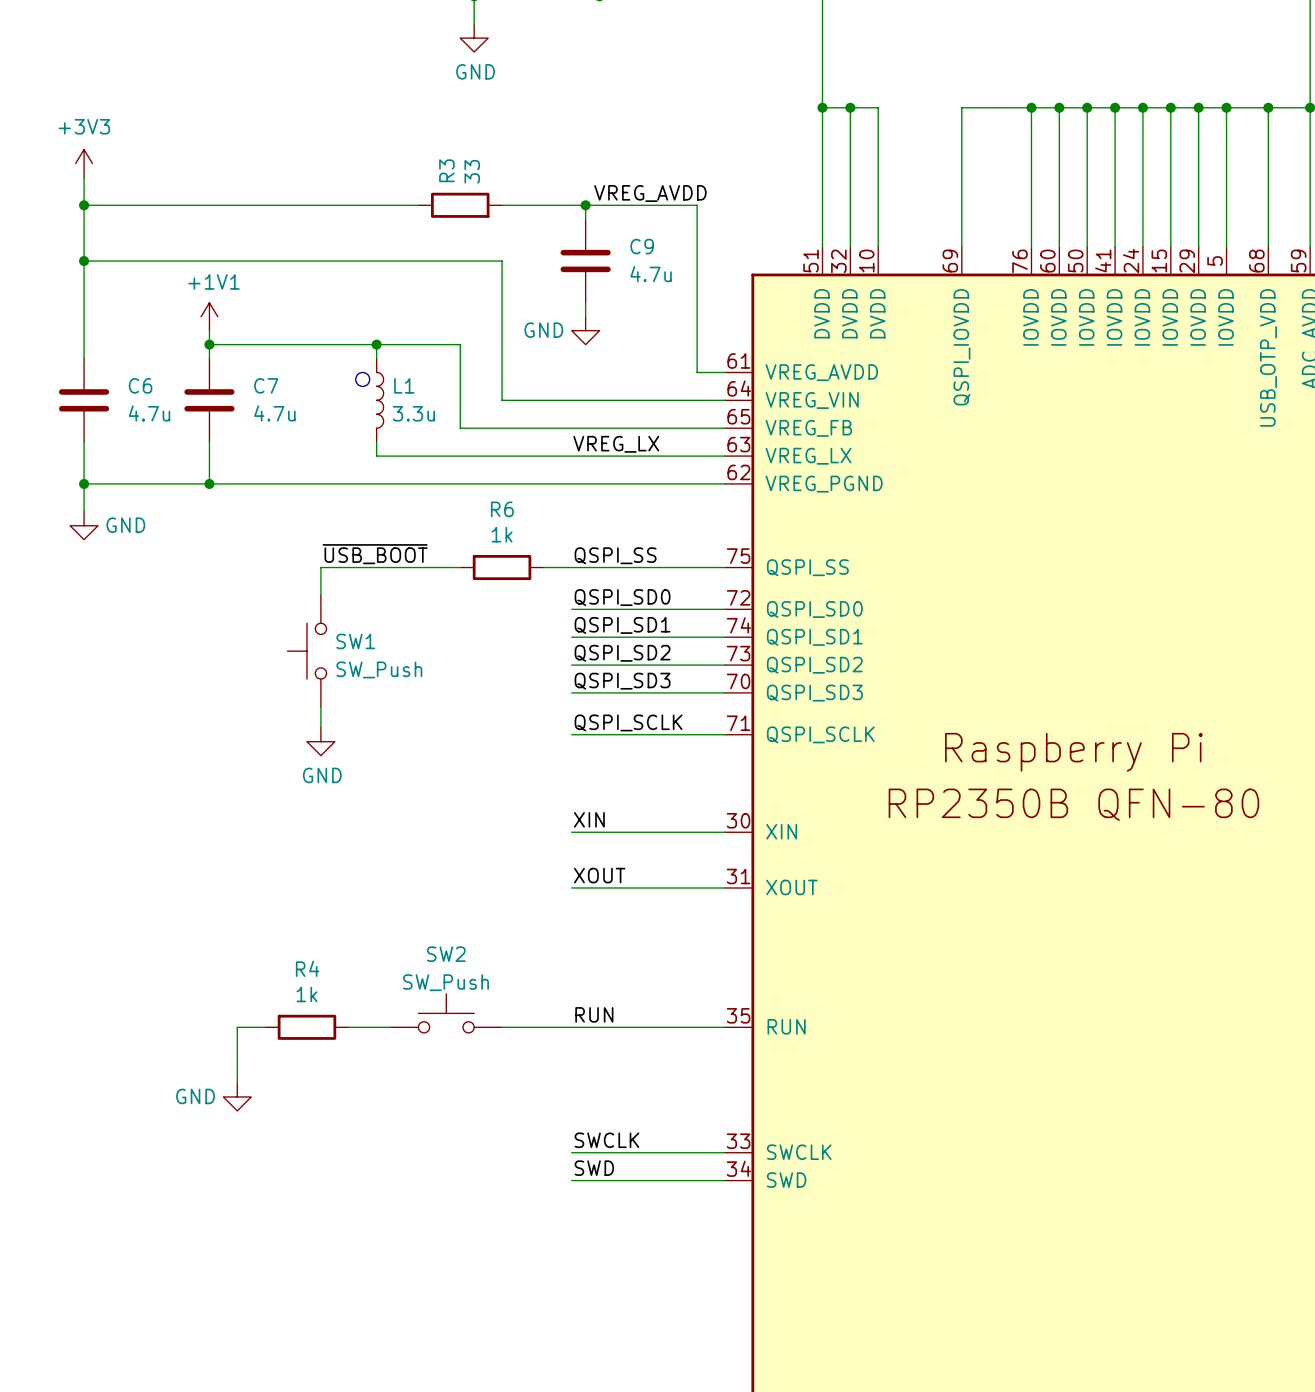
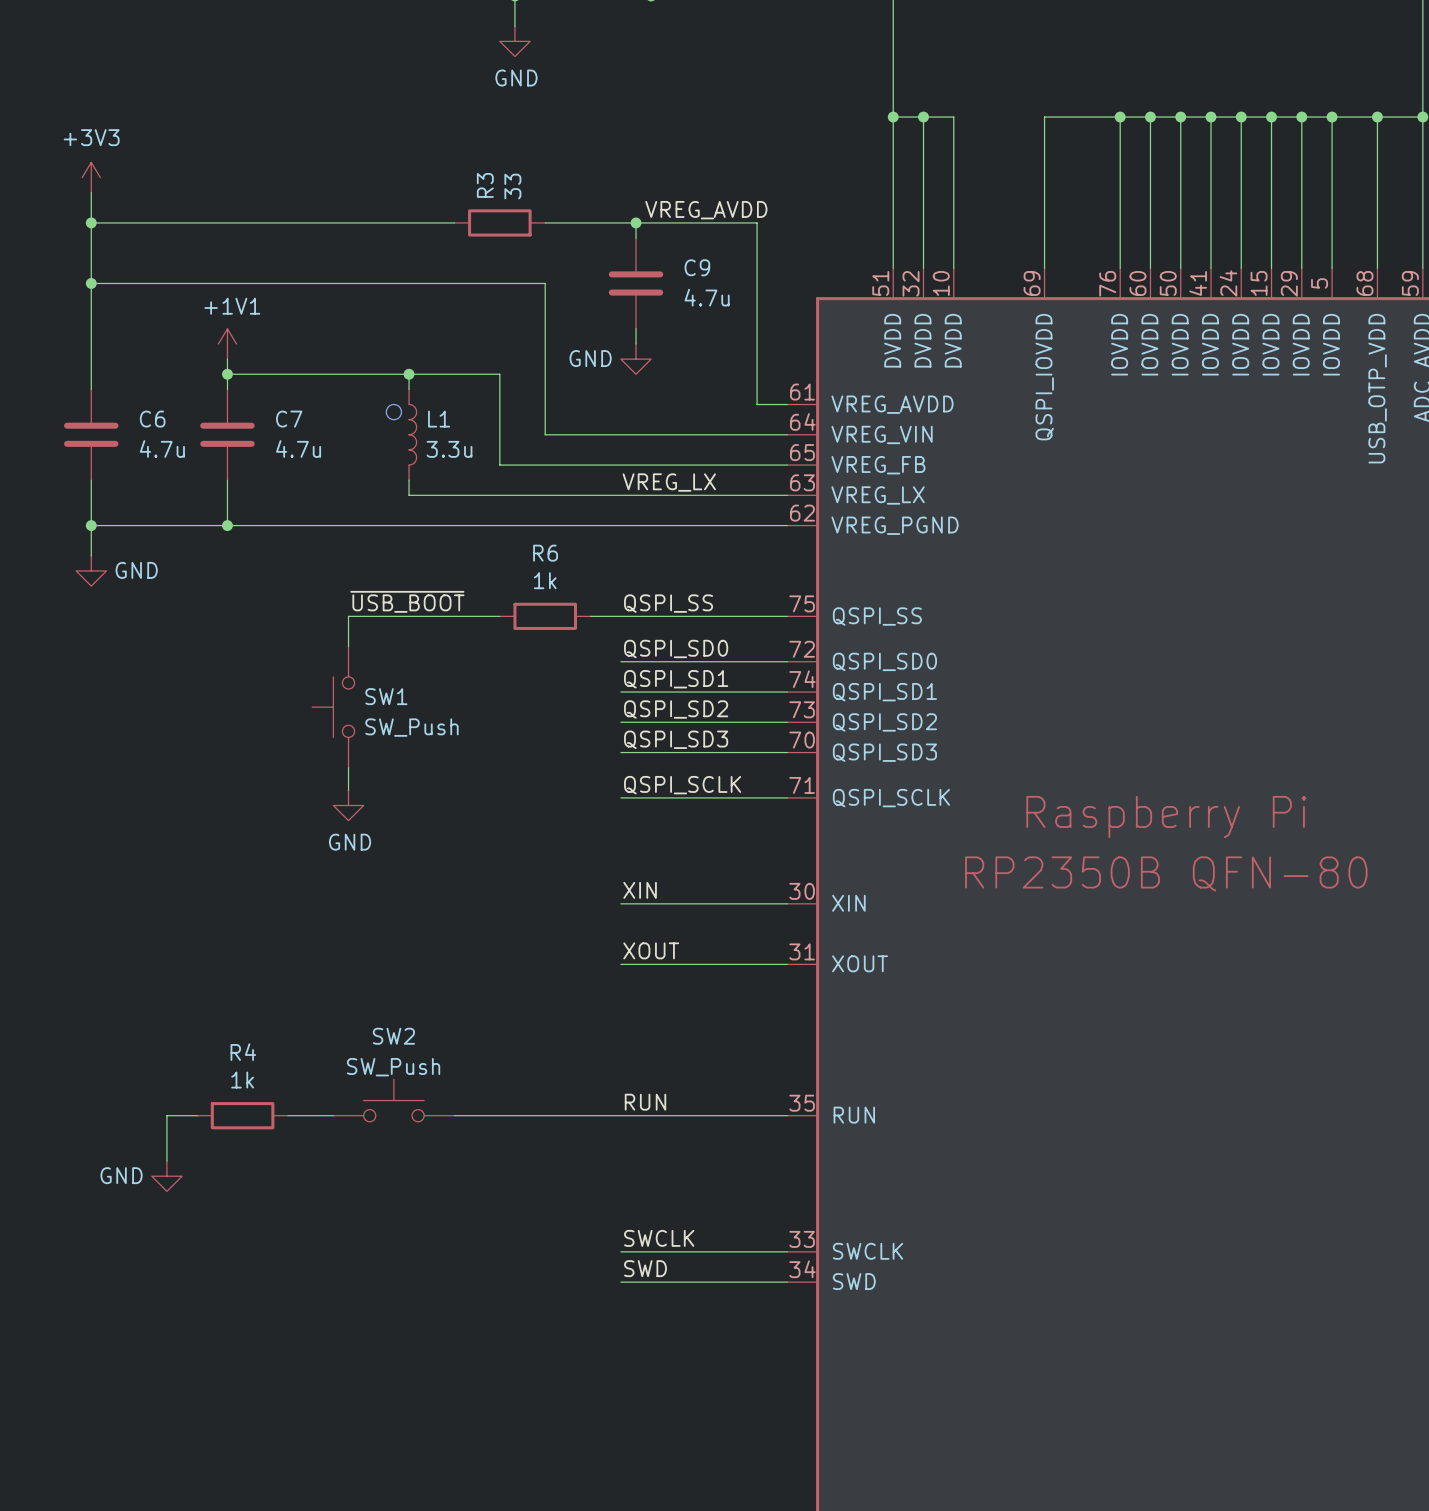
SW2 position: (446, 1013) -> (393, 1100)
wire: none -> (197, 1115) (166, 1115) (166, 1161)
wire: (265, 1027) (237, 1027) (237, 1083) -> (287, 1115) (333, 1115)
R4 position: (306, 1027) -> (242, 1115)
wire: (348, 1027) (390, 1027) -> none
wire: none -> (454, 1115) (545, 1115)
power symbol position: GND (237, 1096) -> GND (166, 1176)

